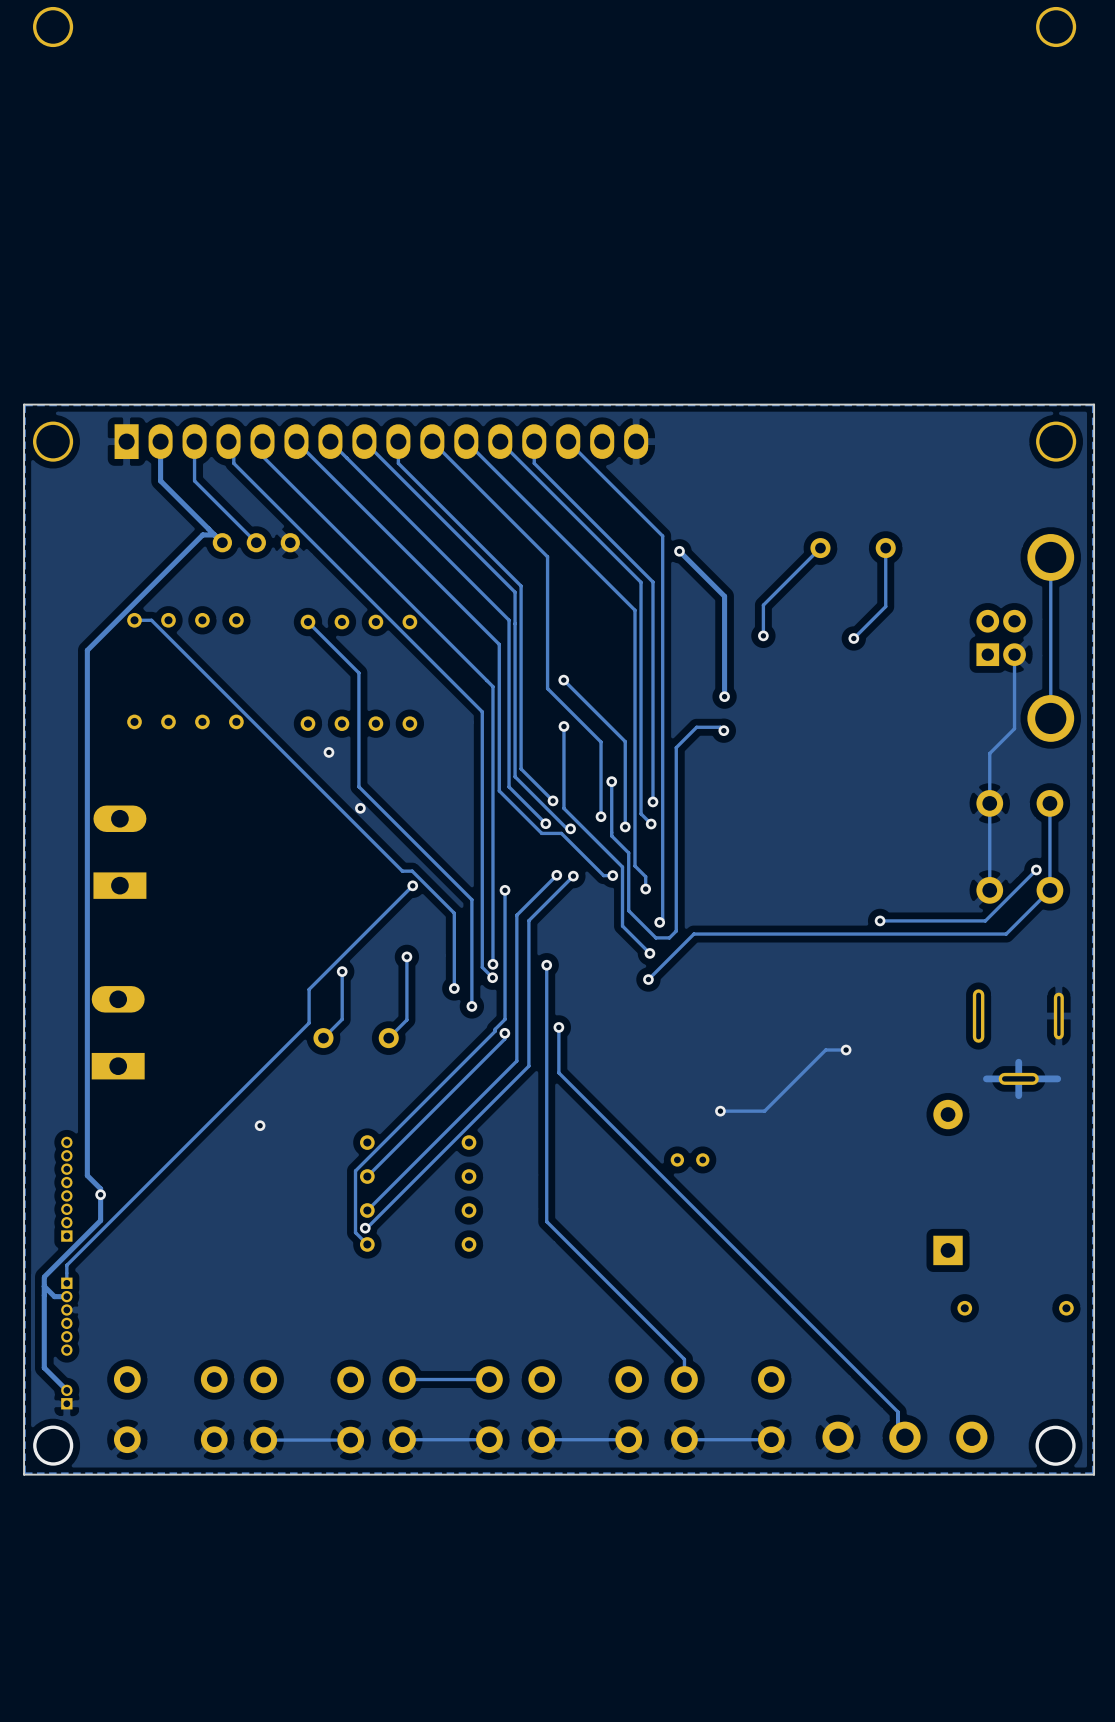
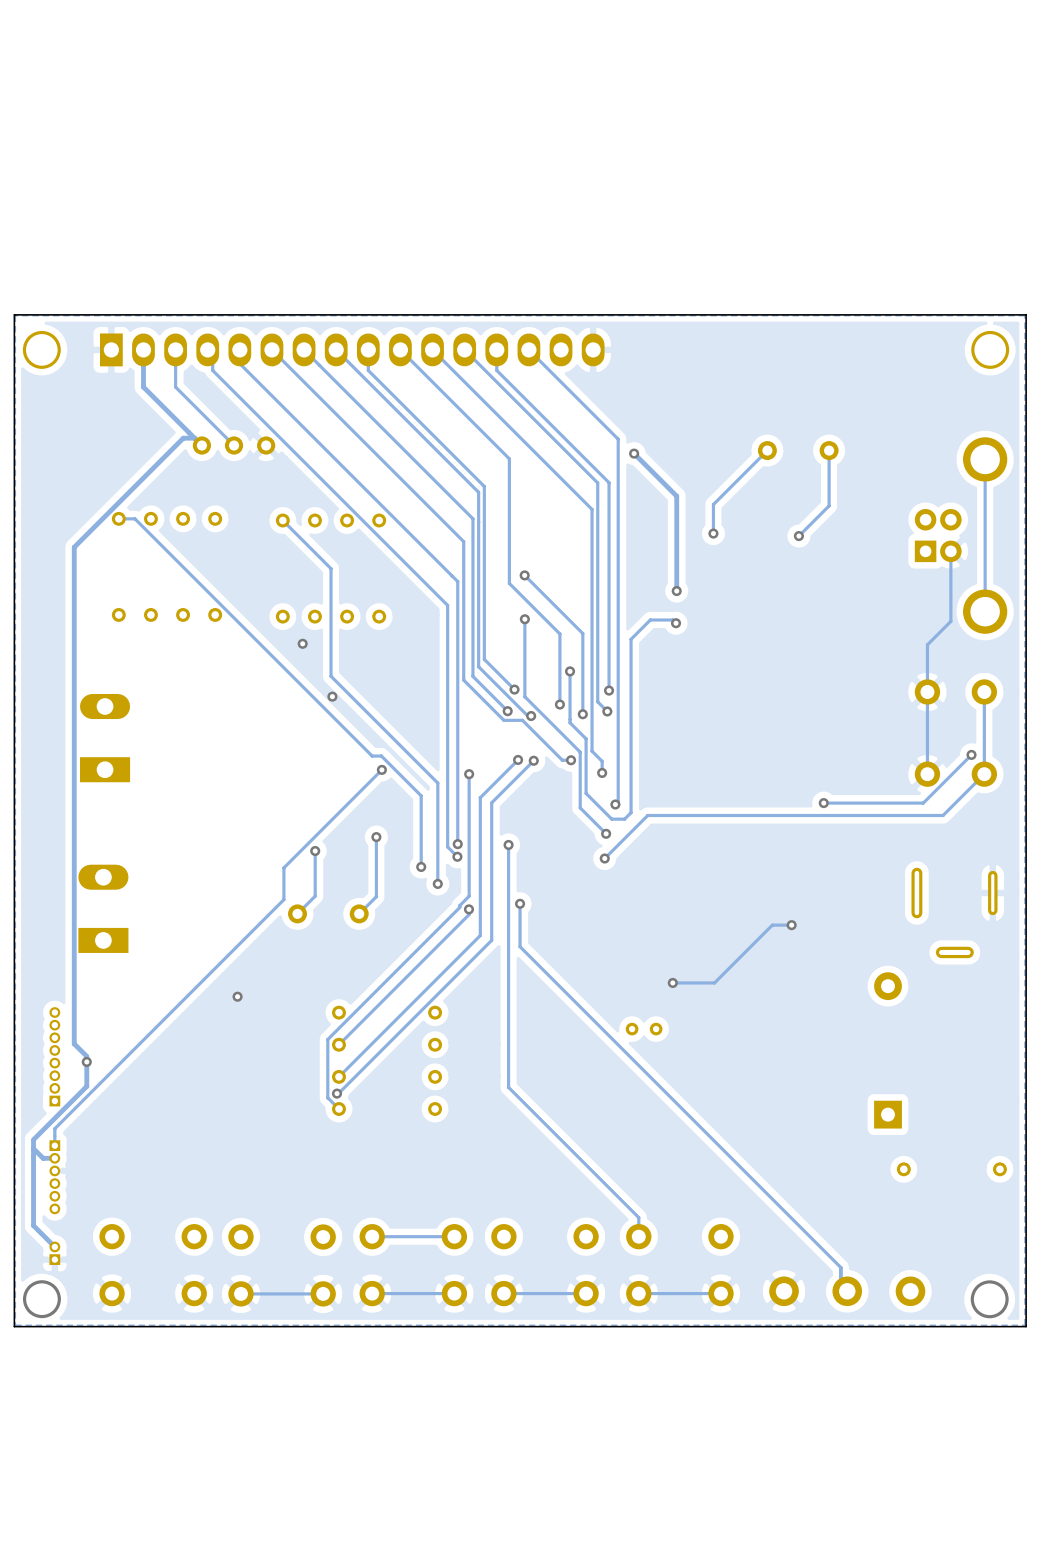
track: (1018, 1062) (1018, 1095) -> none
track: (1057, 1078) (986, 1078) -> none

